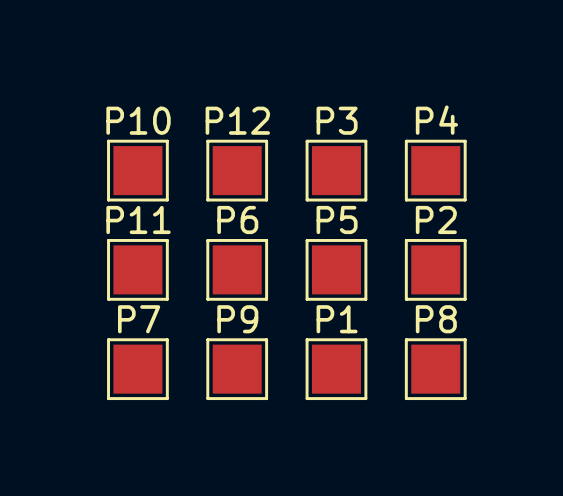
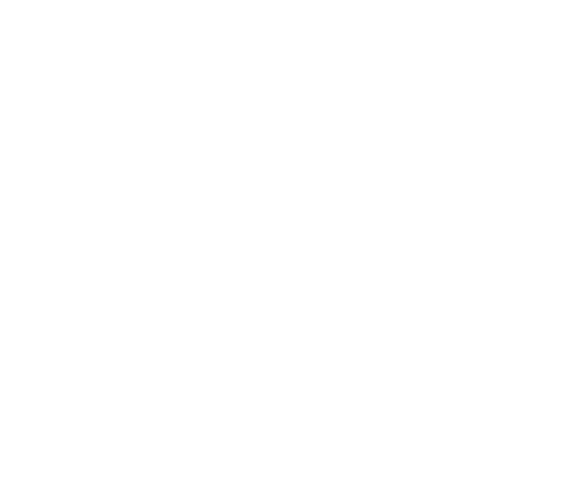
P10: (137, 170) -> none
P12: (237, 170) -> none
P3: (336, 170) -> none
P4: (435, 170) -> none
P11: (137, 269) -> none
P6: (237, 269) -> none
P5: (336, 269) -> none
P2: (435, 269) -> none
P7: (137, 369) -> none
P9: (237, 369) -> none
P1: (336, 369) -> none
P8: (435, 369) -> none

